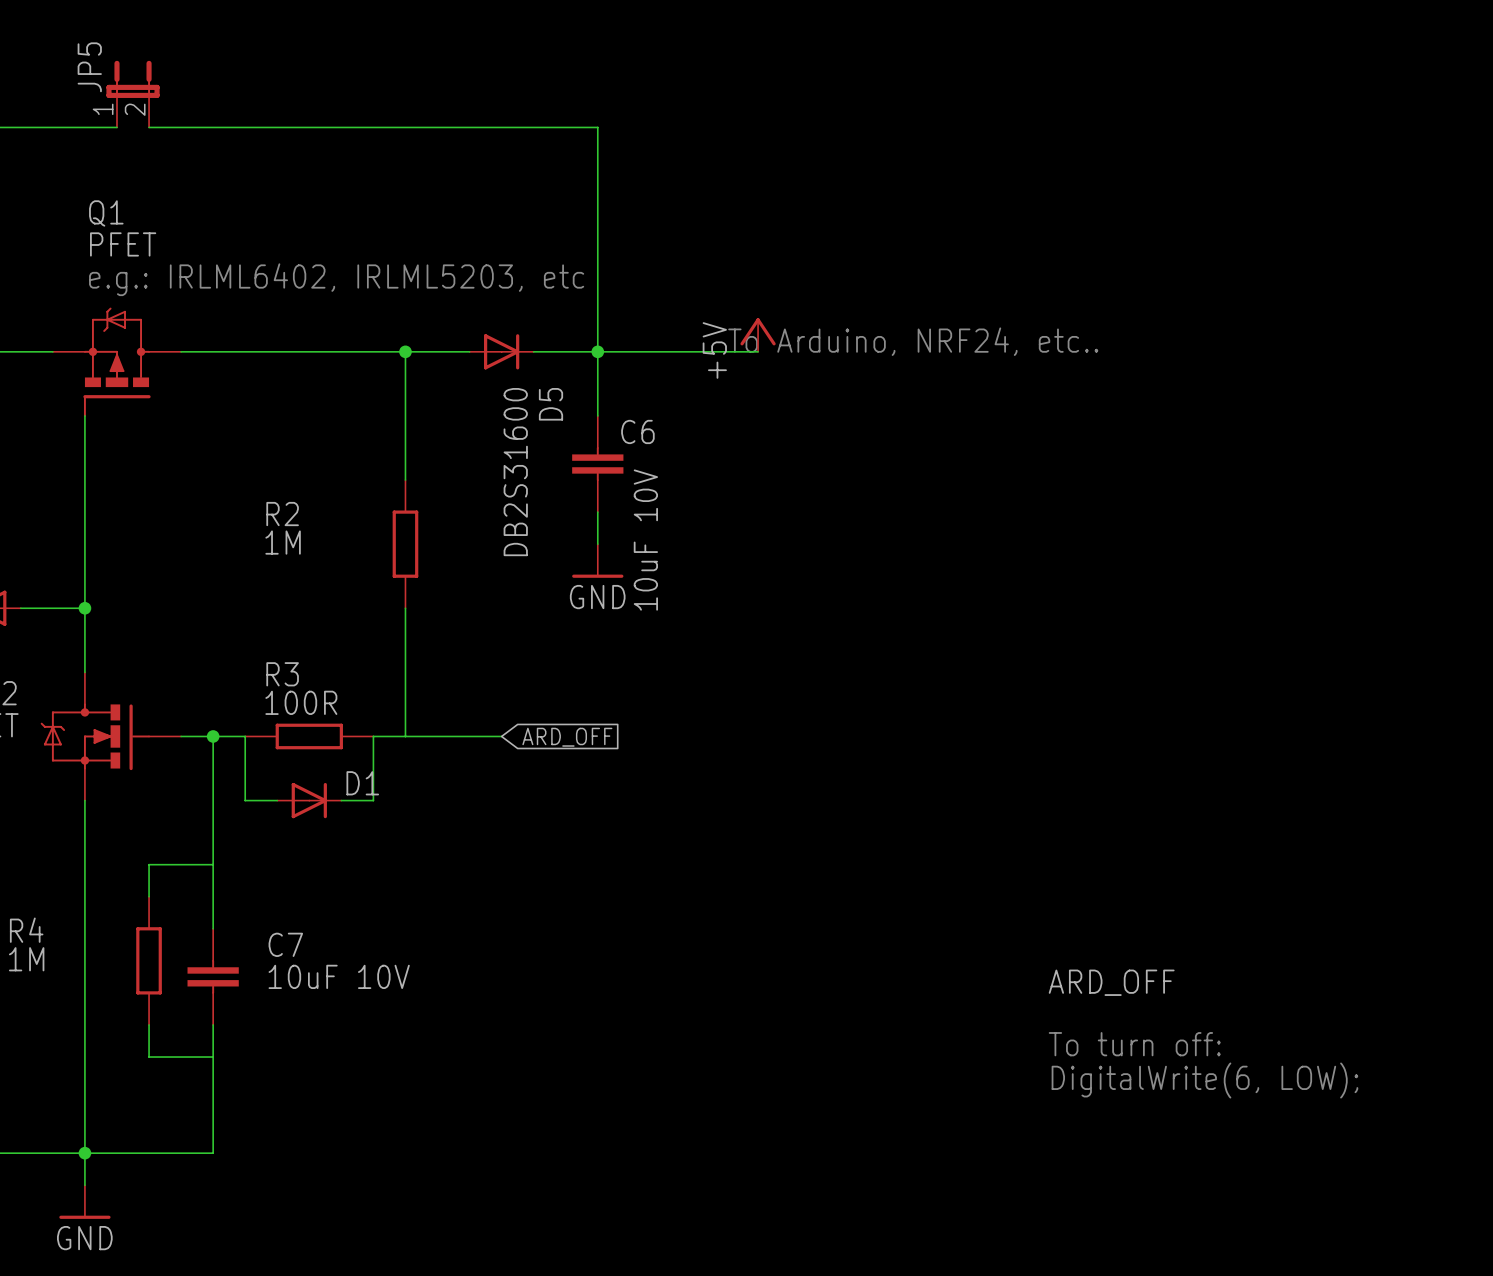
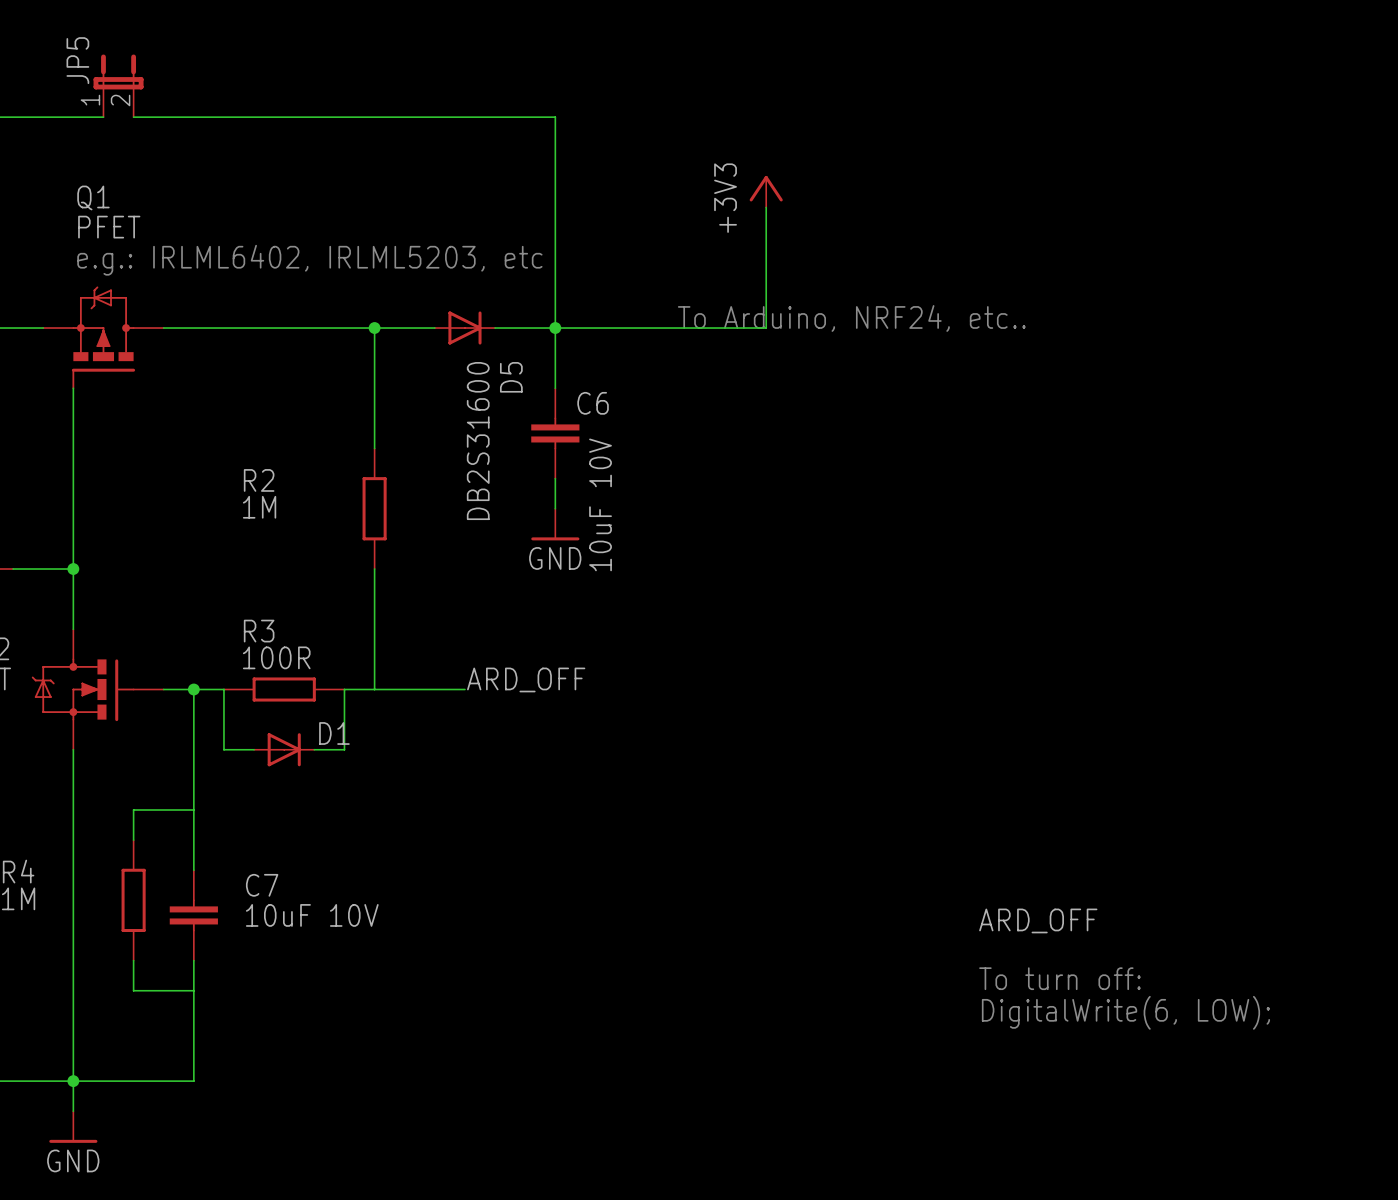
power symbol: none -> +3V3 (766, 191)
wire: none -> (766, 207) (766, 328) (705, 328)
power symbol: +5V (758, 335) -> none
label: none -> ARD_OFF (526, 679)
global label: ARD_OFF (567, 737) -> none

